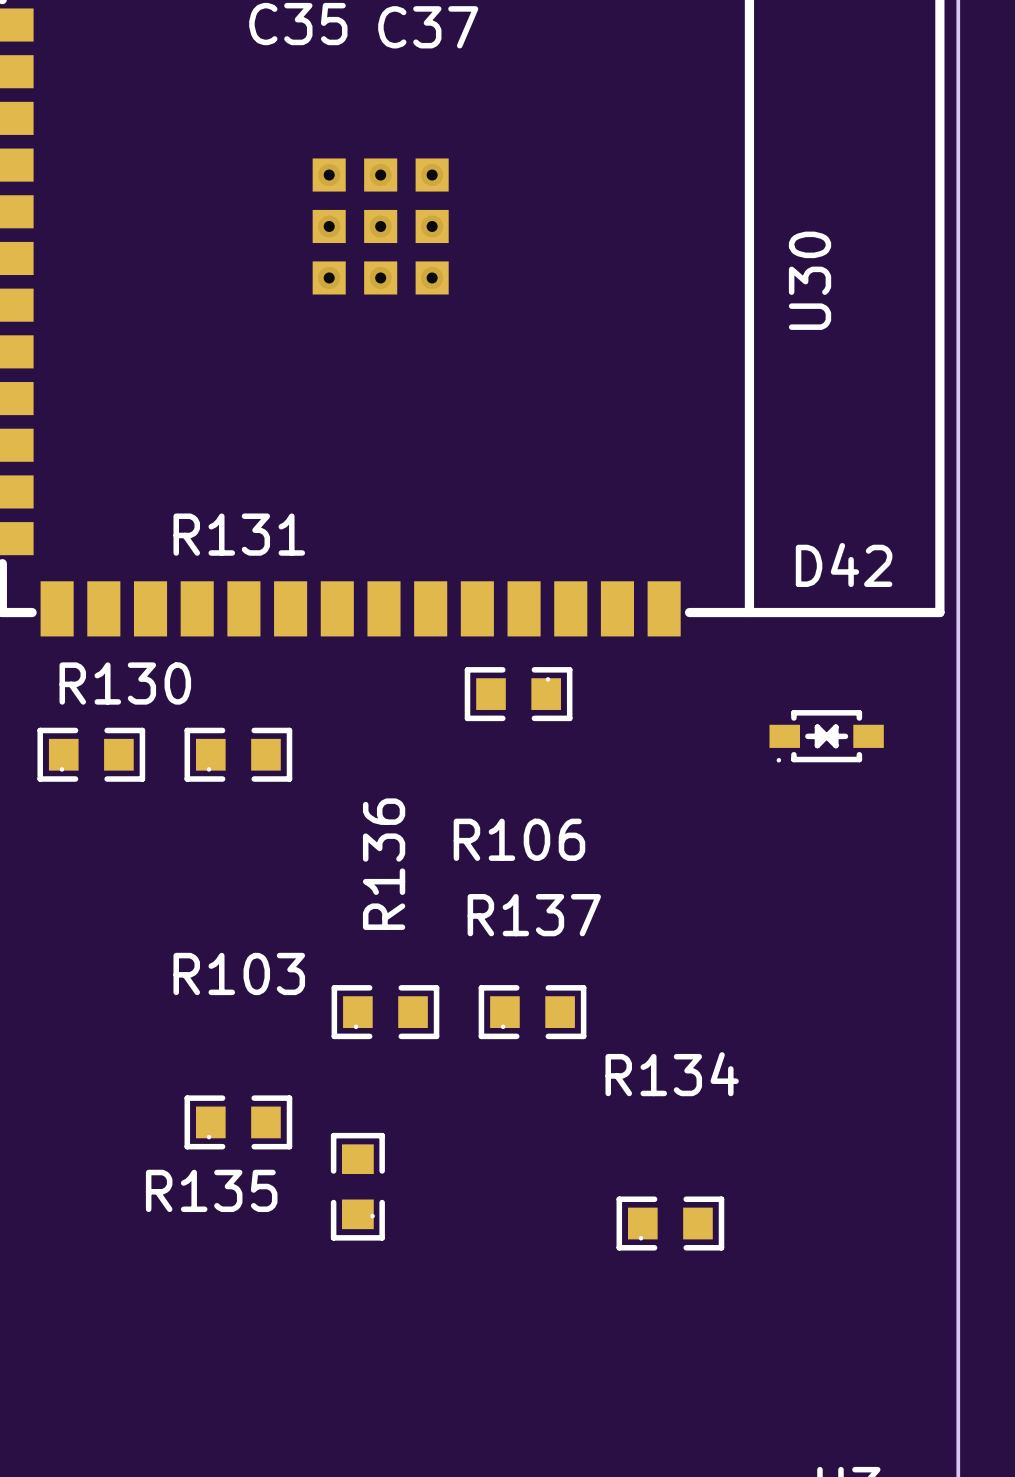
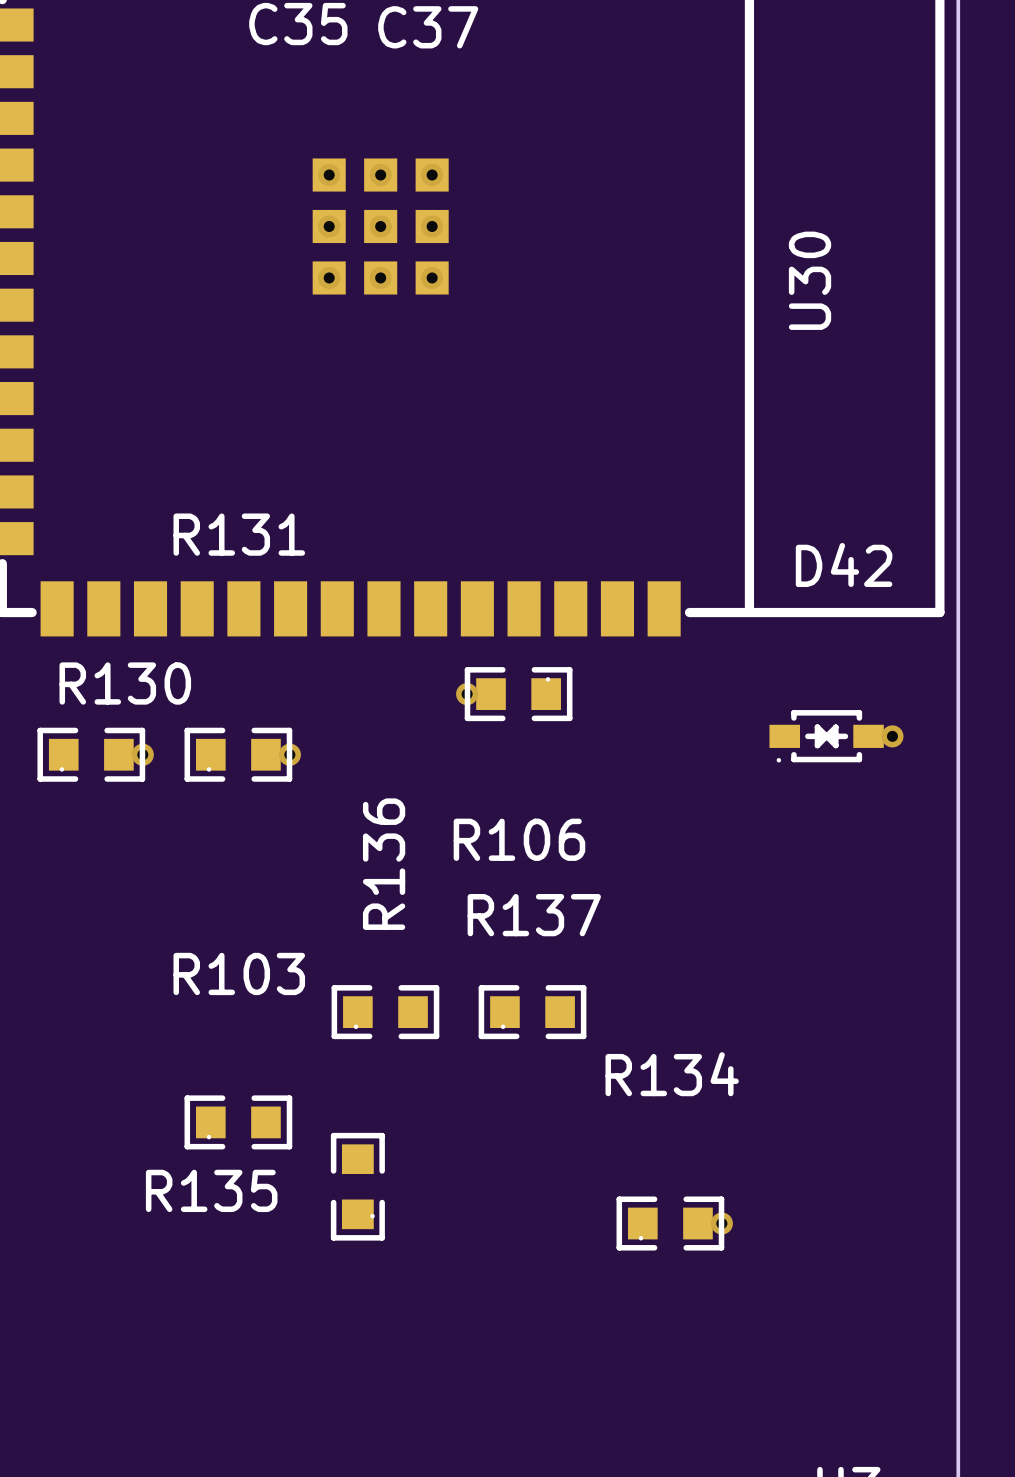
via: none -> (467, 694)
via: none -> (892, 736)
via: none -> (142, 754)
via: none -> (289, 754)
via: none -> (721, 1223)

